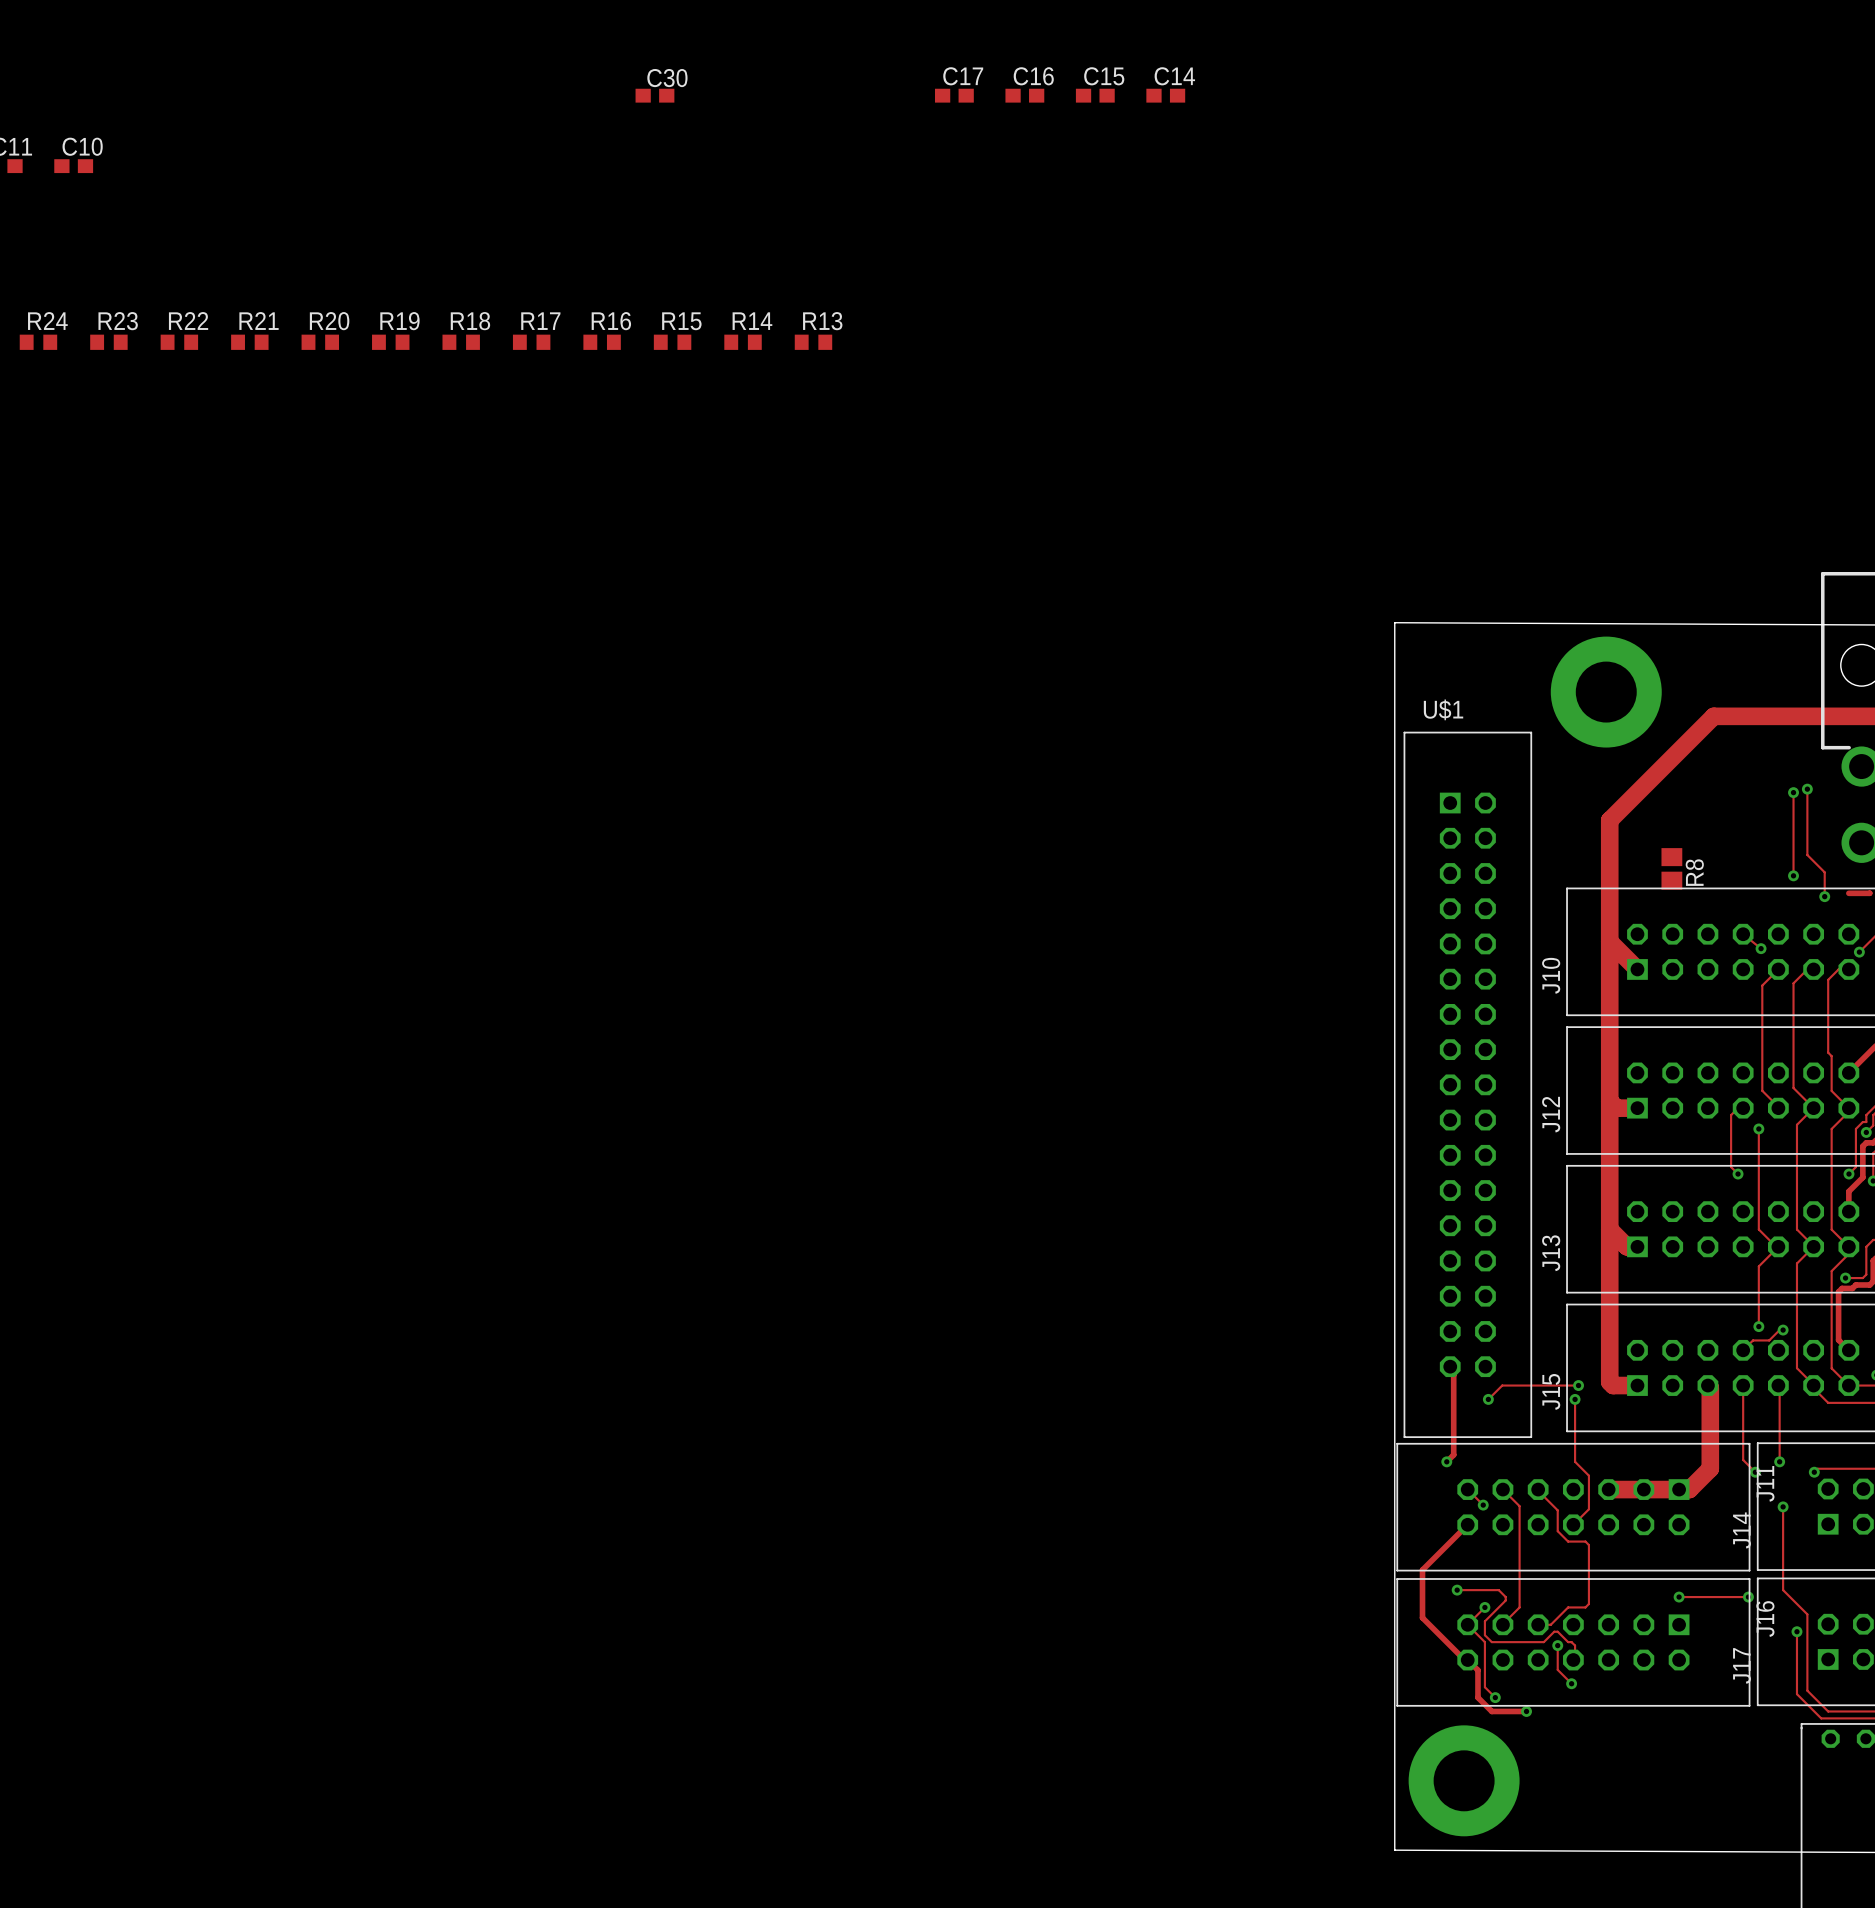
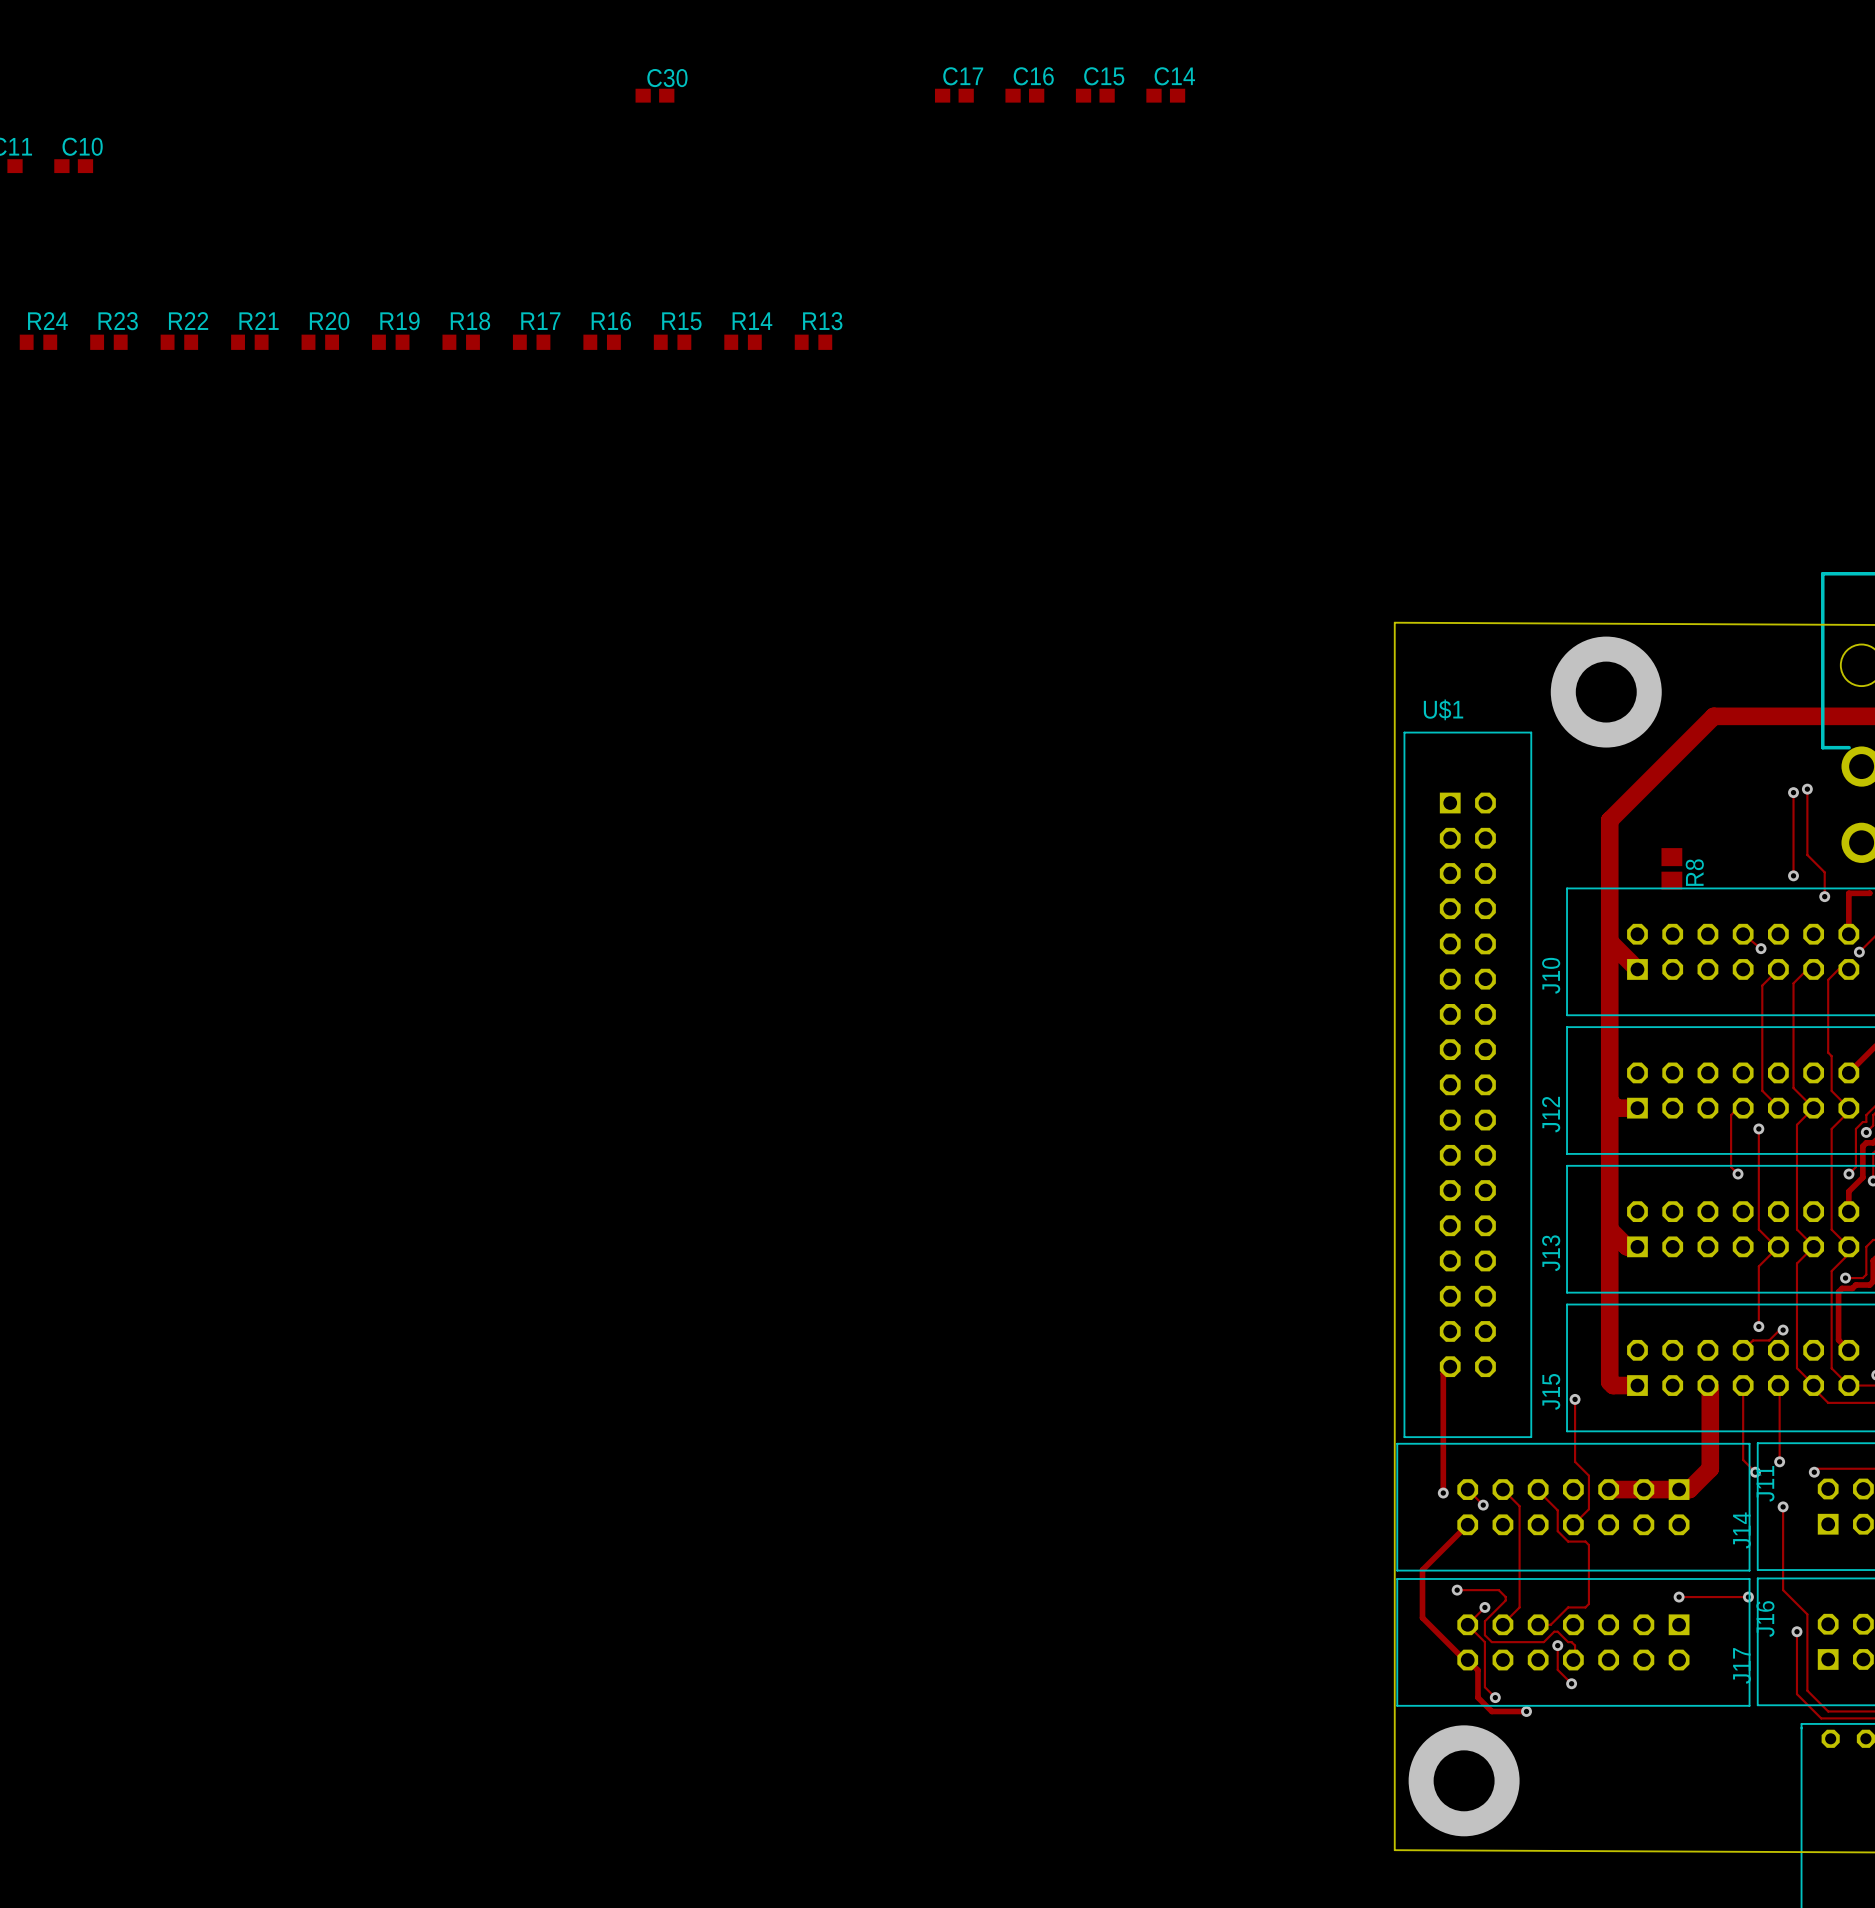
track: none -> (1848, 893) (1848, 934)
track: (1450, 1366) (1450, 1371) (1453, 1375) (1453, 1454) (1446, 1461) -> (1450, 1366) (1443, 1373) (1443, 1493)
track: (1578, 1385) (1502, 1385) (1488, 1399) -> none
via: (1578, 1385) -> none
via: (1488, 1399) -> none
via position: (1446, 1461) -> (1443, 1493)

